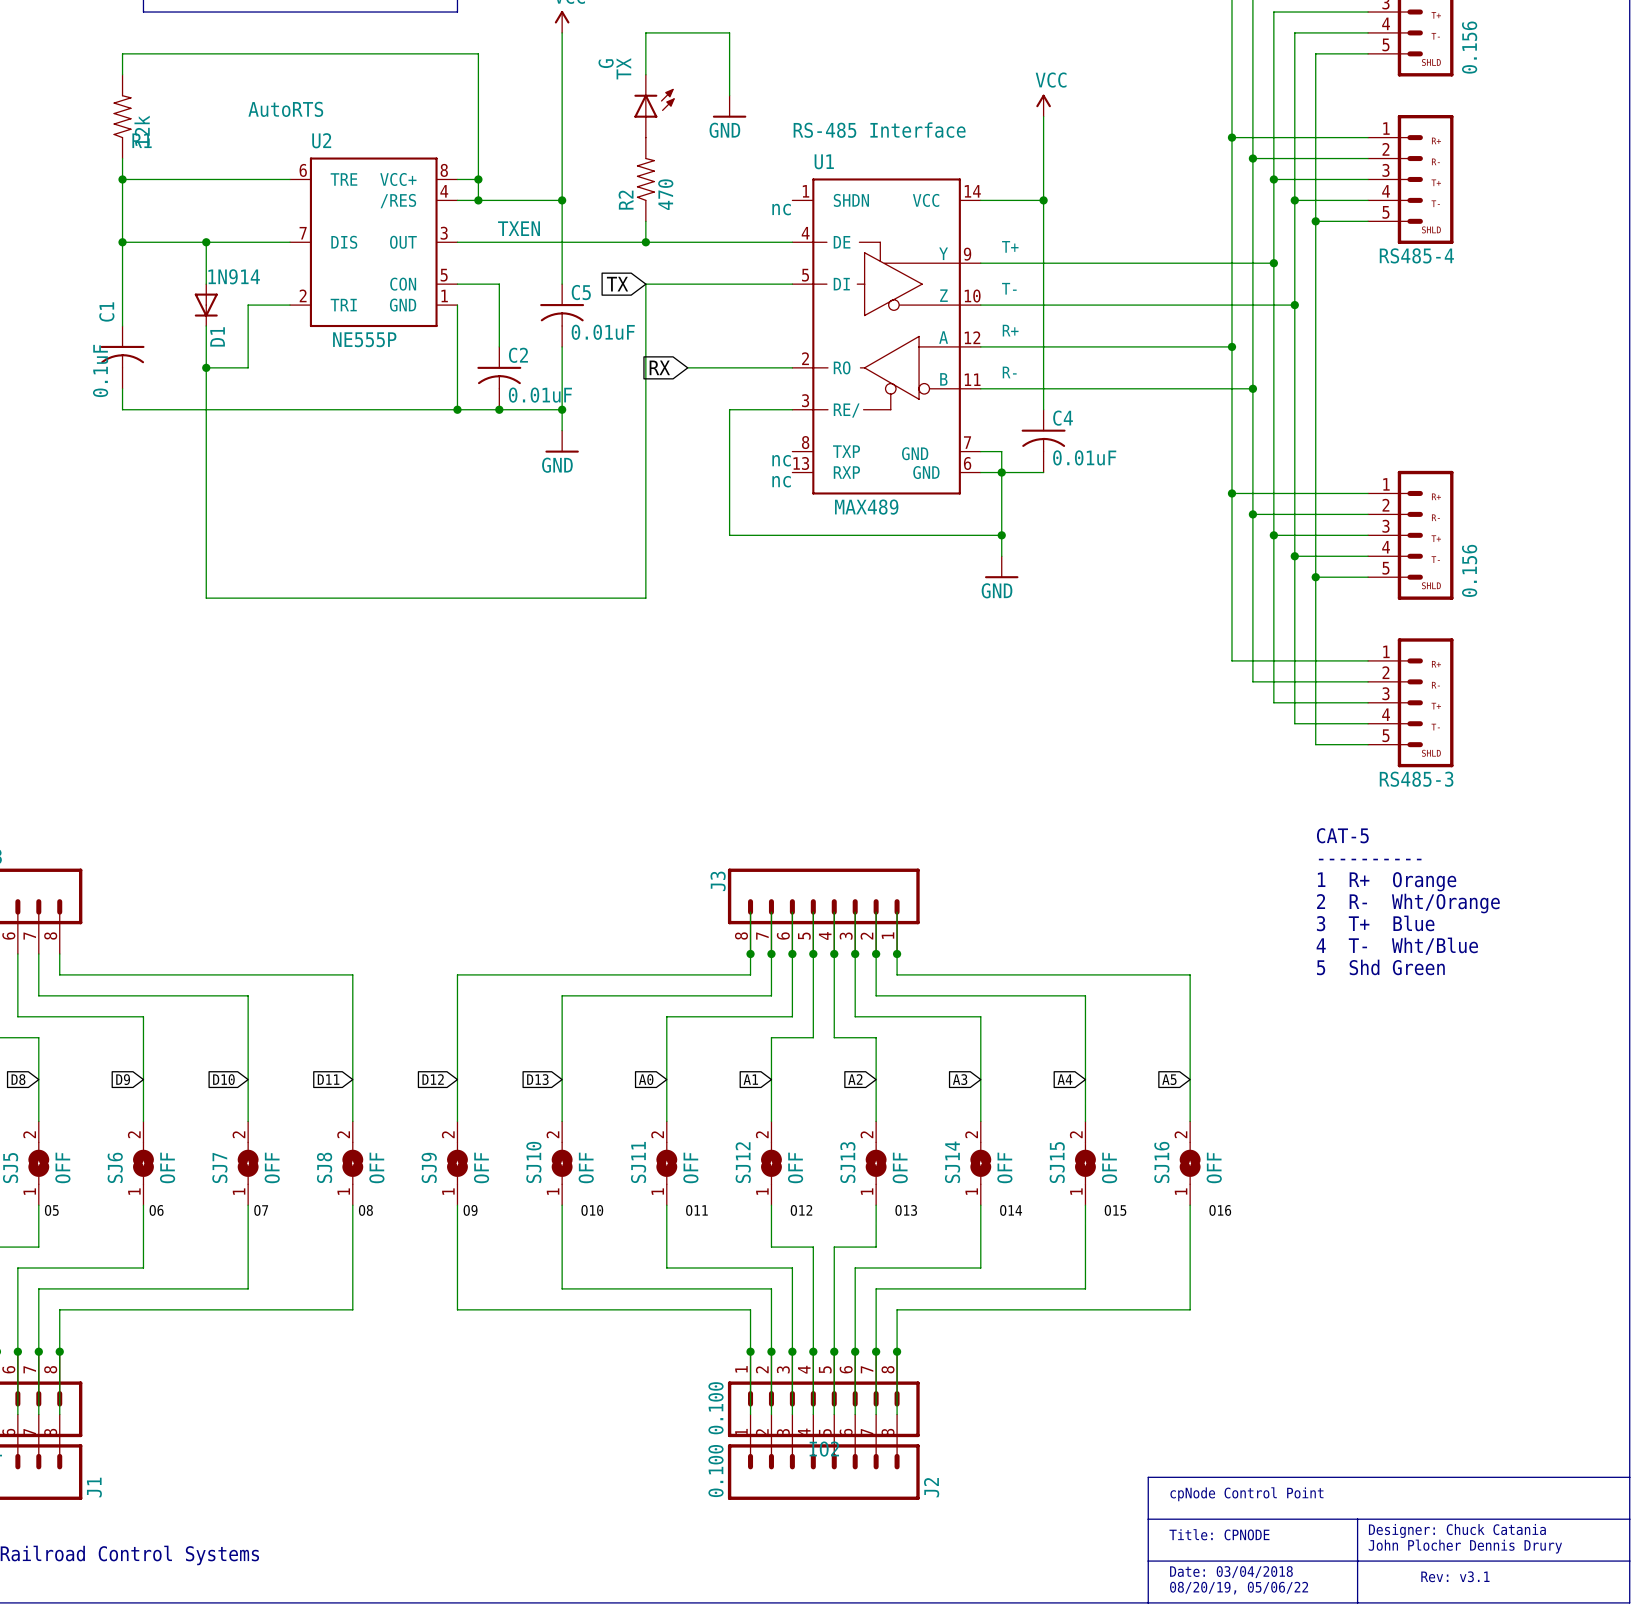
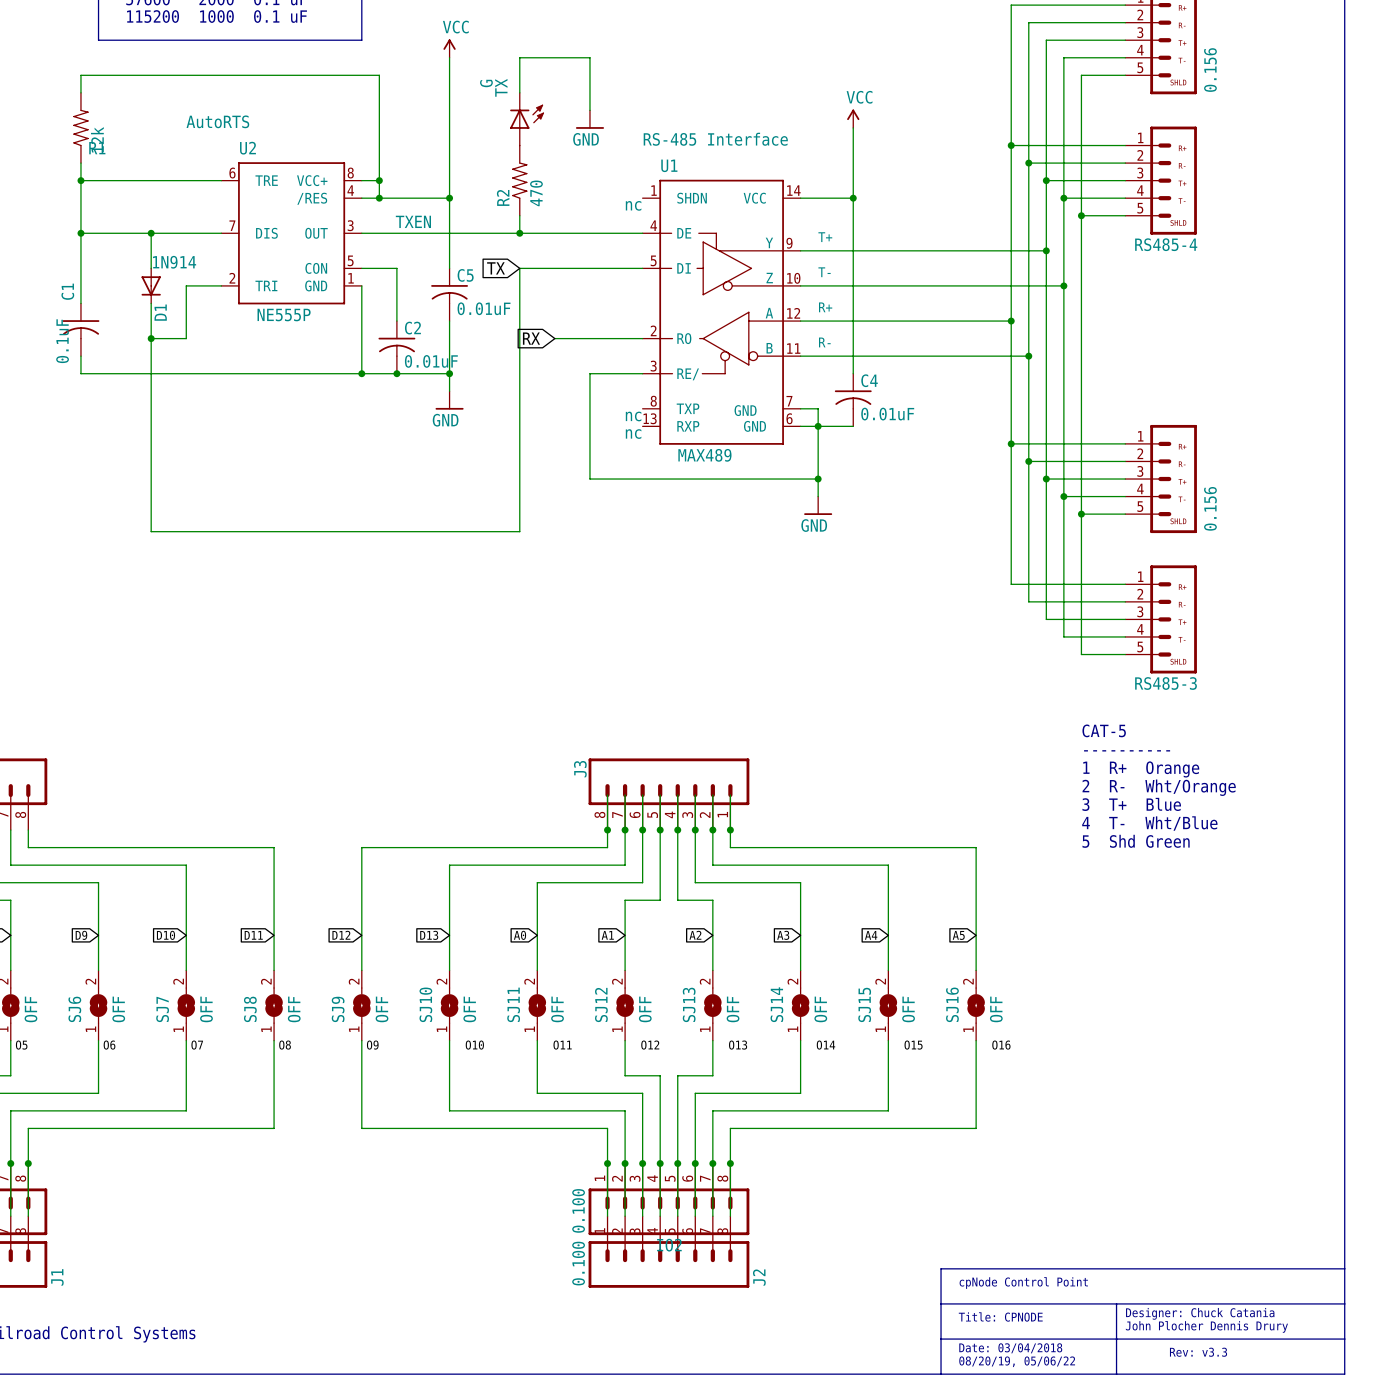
text: Rev: v3.1 (1455, 1576) -> Rev: v3.3 (1198, 1352)

